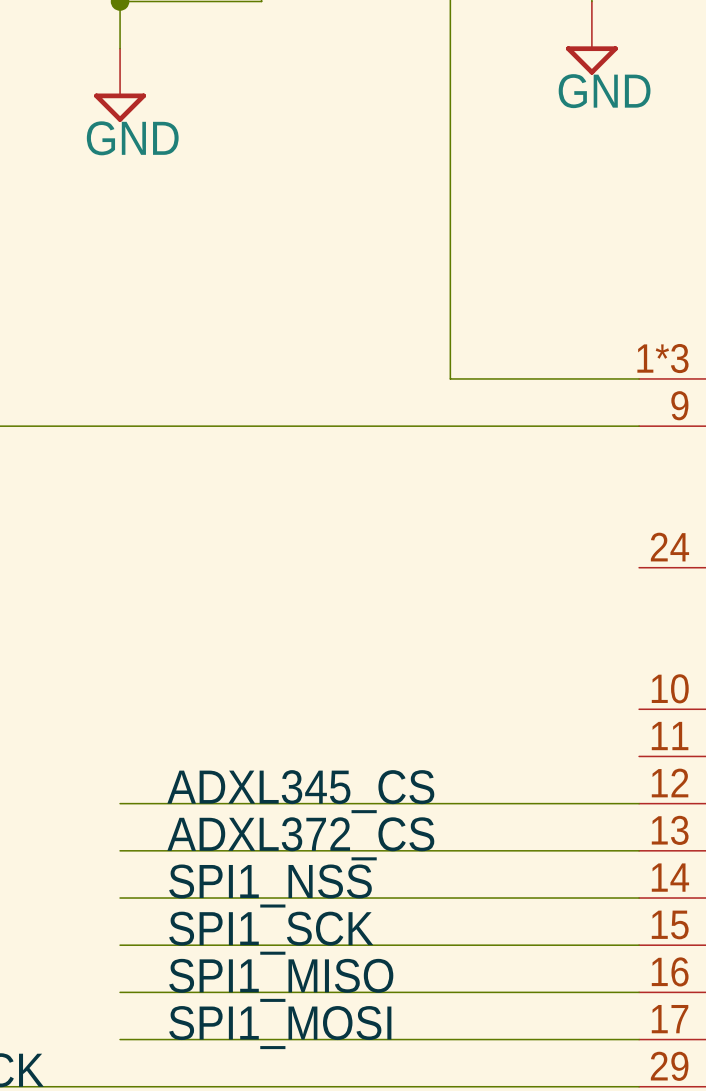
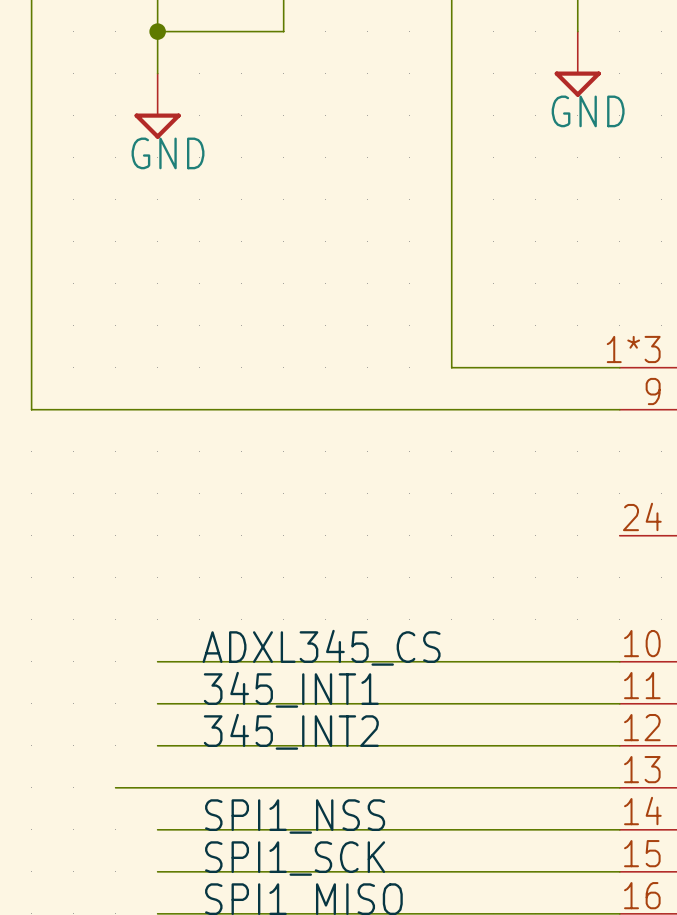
label: none -> ADXL345_CS (321, 647)
wire: none -> (157, 661) (619, 661)
label: none -> 345_INT1 (291, 689)
wire: none -> (157, 703) (619, 703)
label: ADXL345_CS (300, 791) -> 345_INT2 (291, 731)
label: ADXL372_CS (300, 838) -> none
wire: none -> (115, 787) (157, 787)

